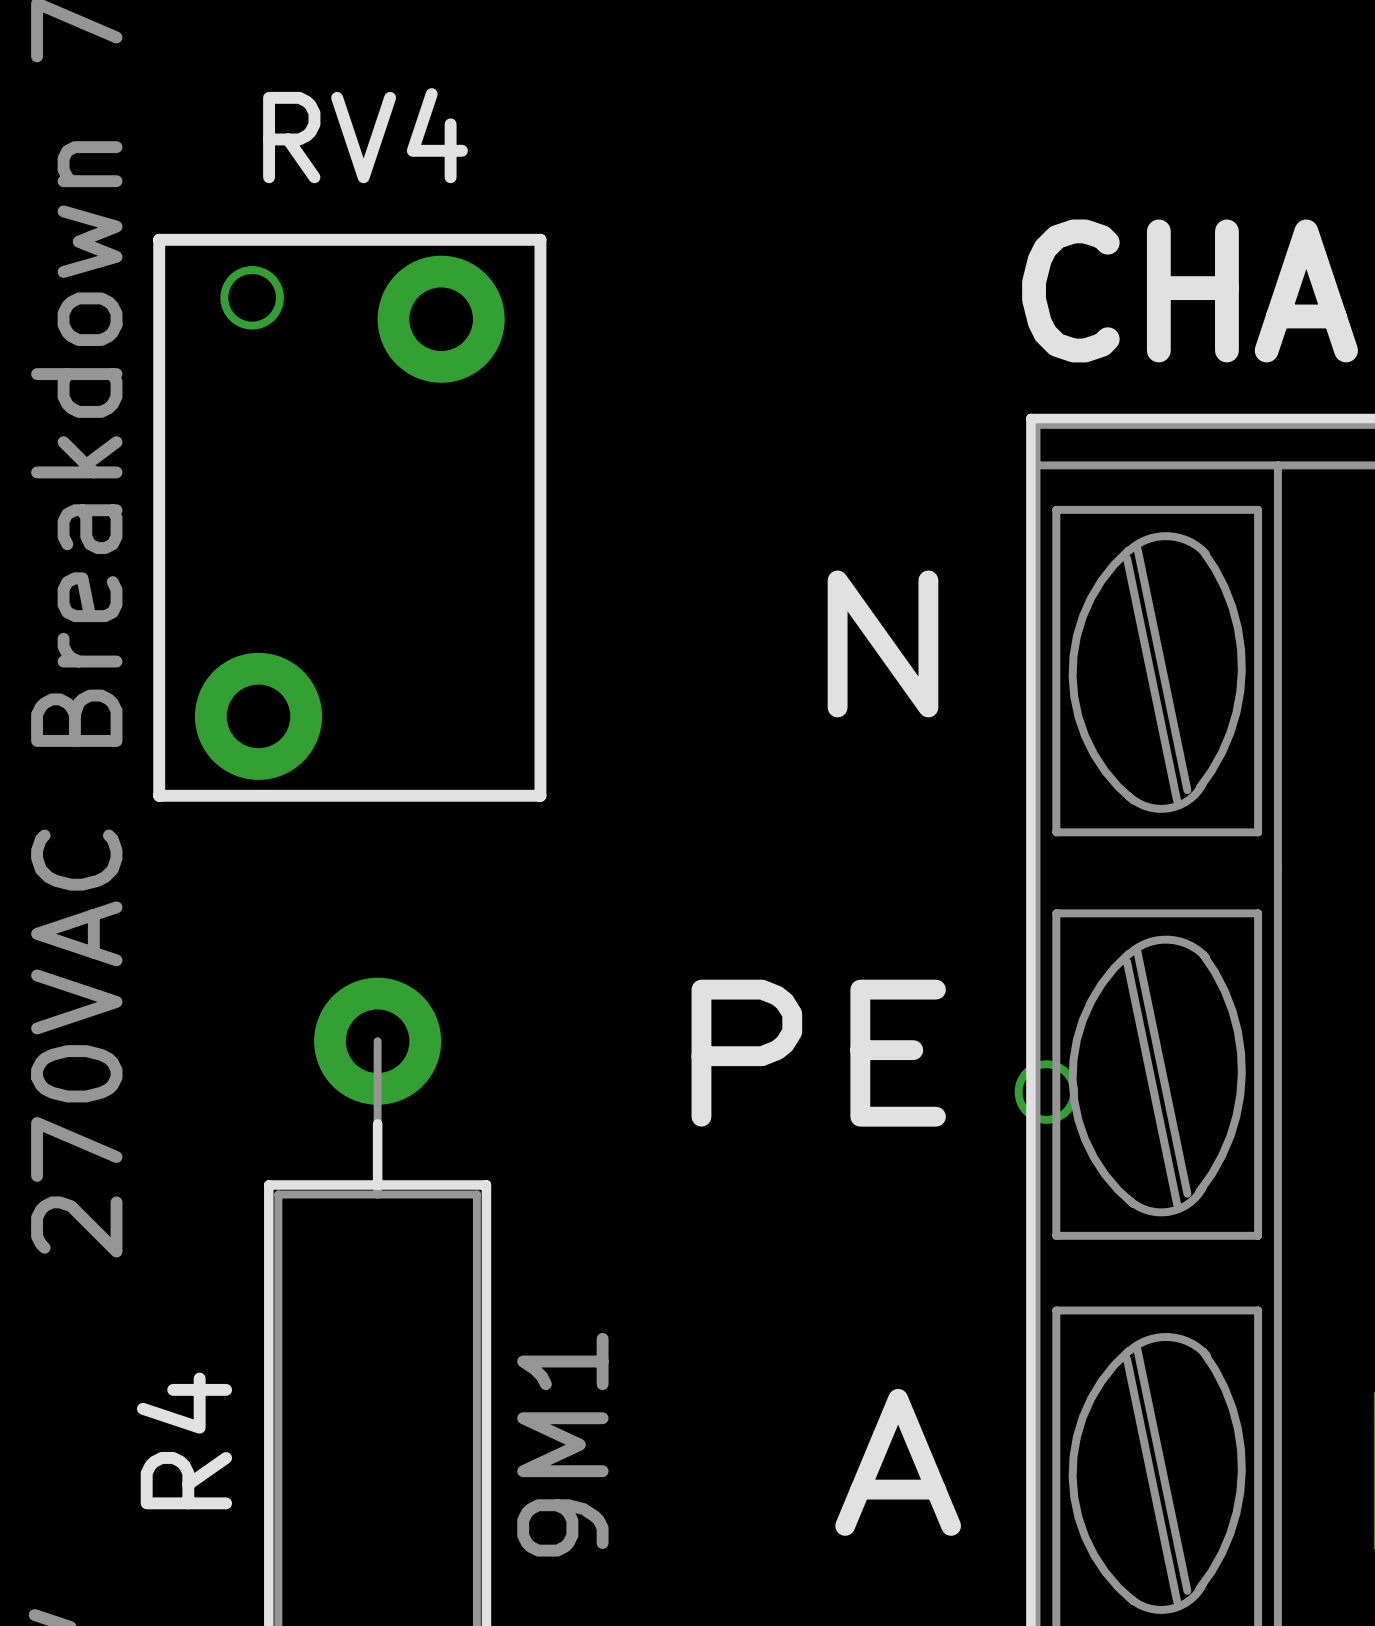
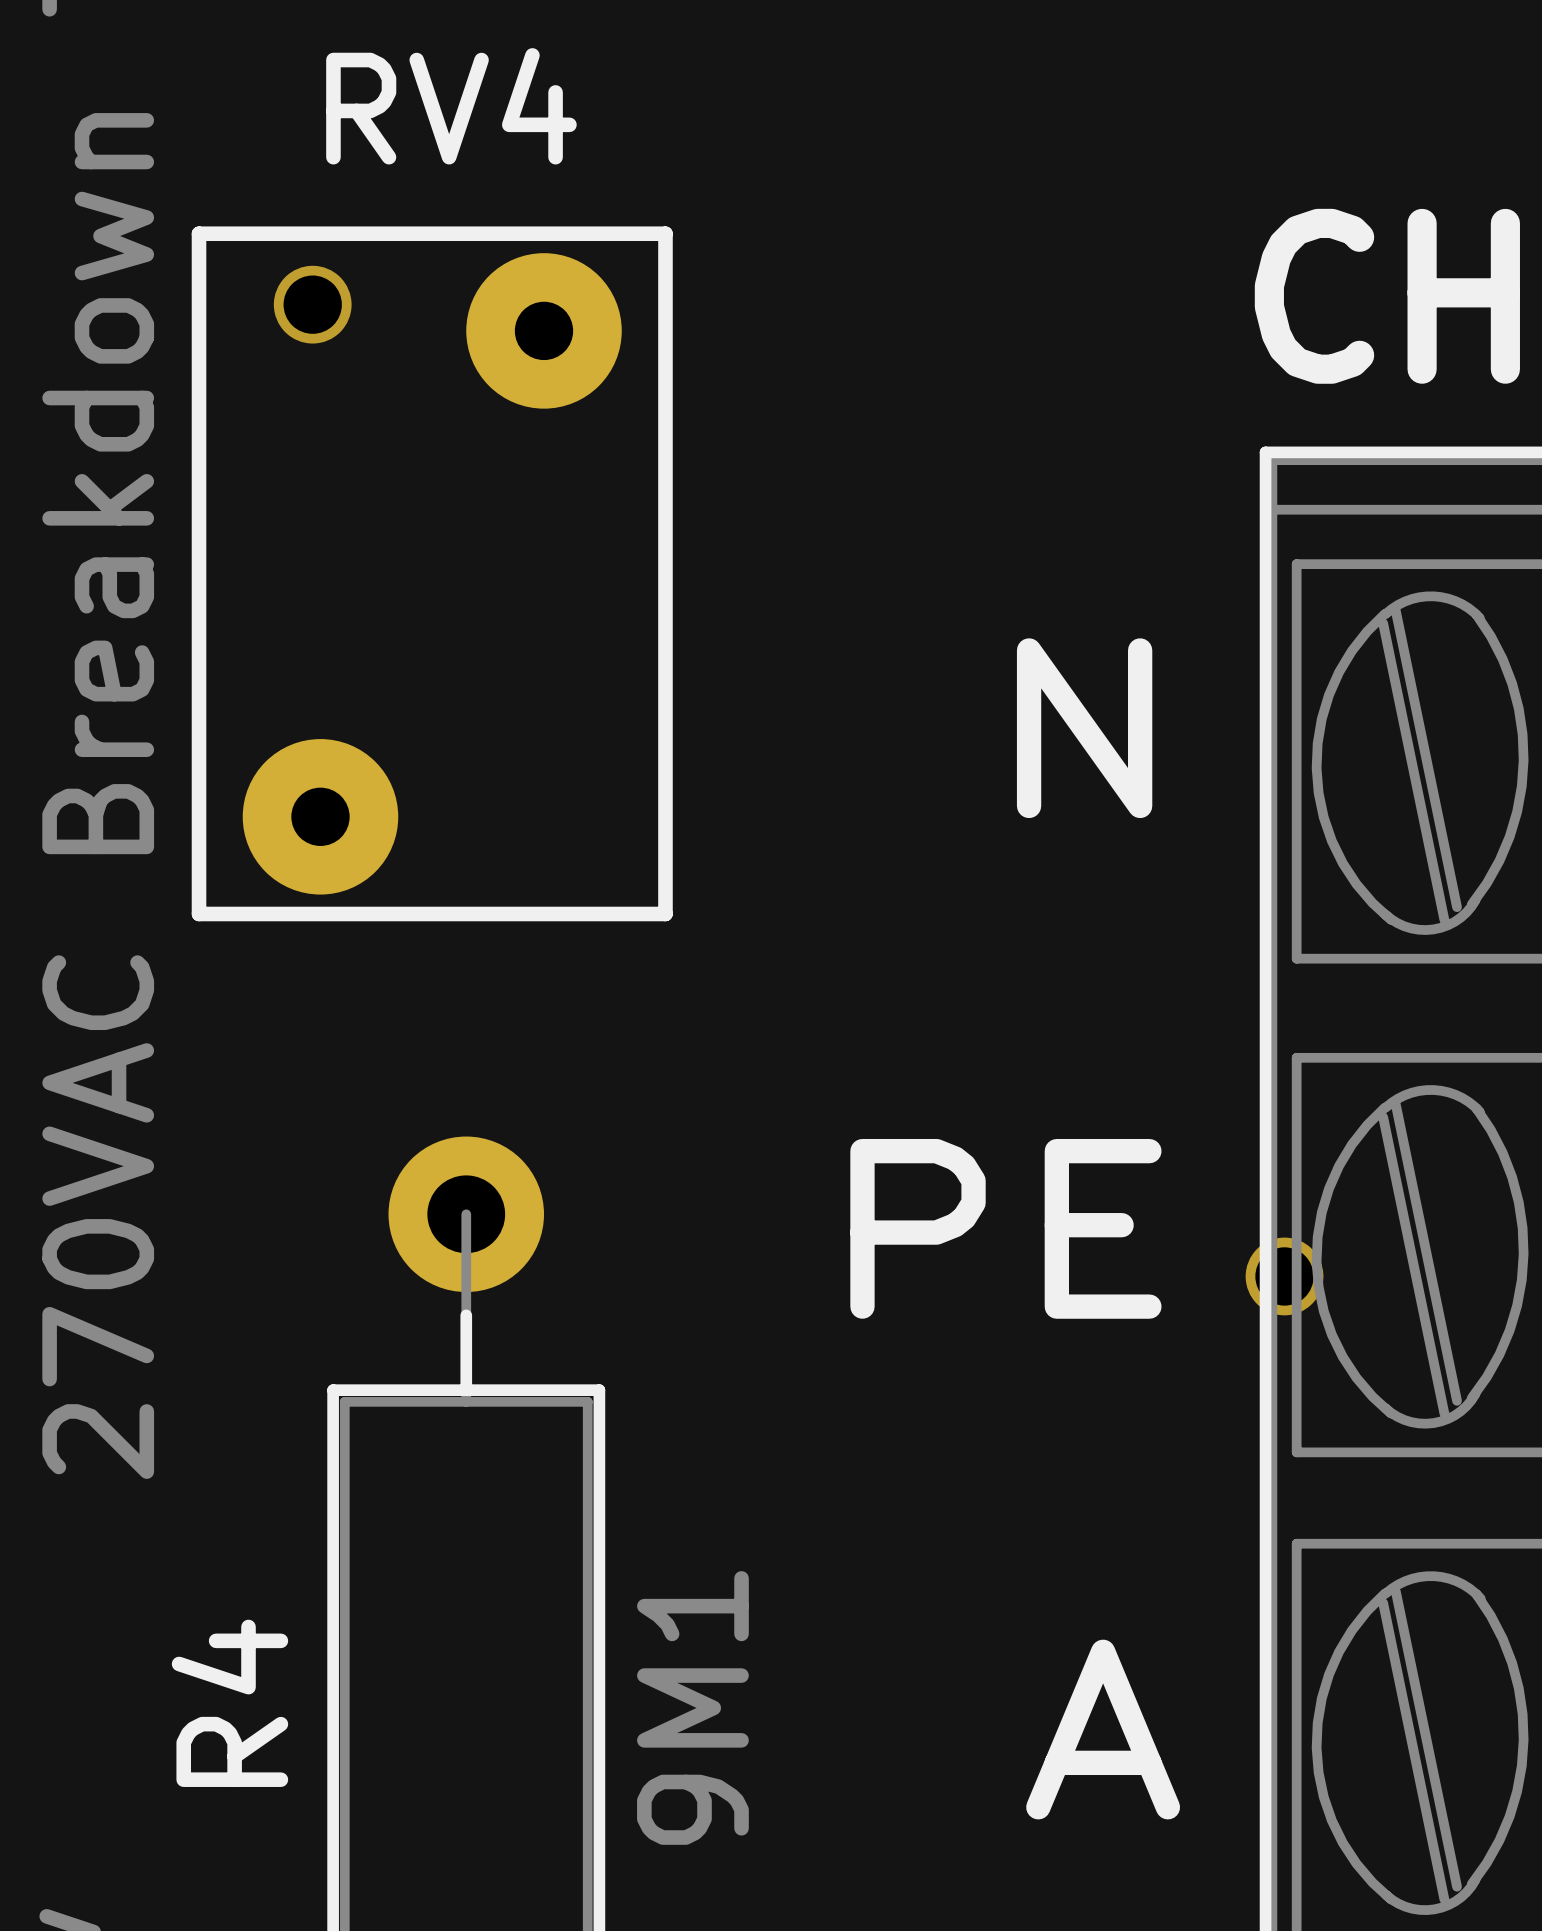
RV4 footprint: [153, 233, 547, 802] -> [191, 226, 673, 922]

